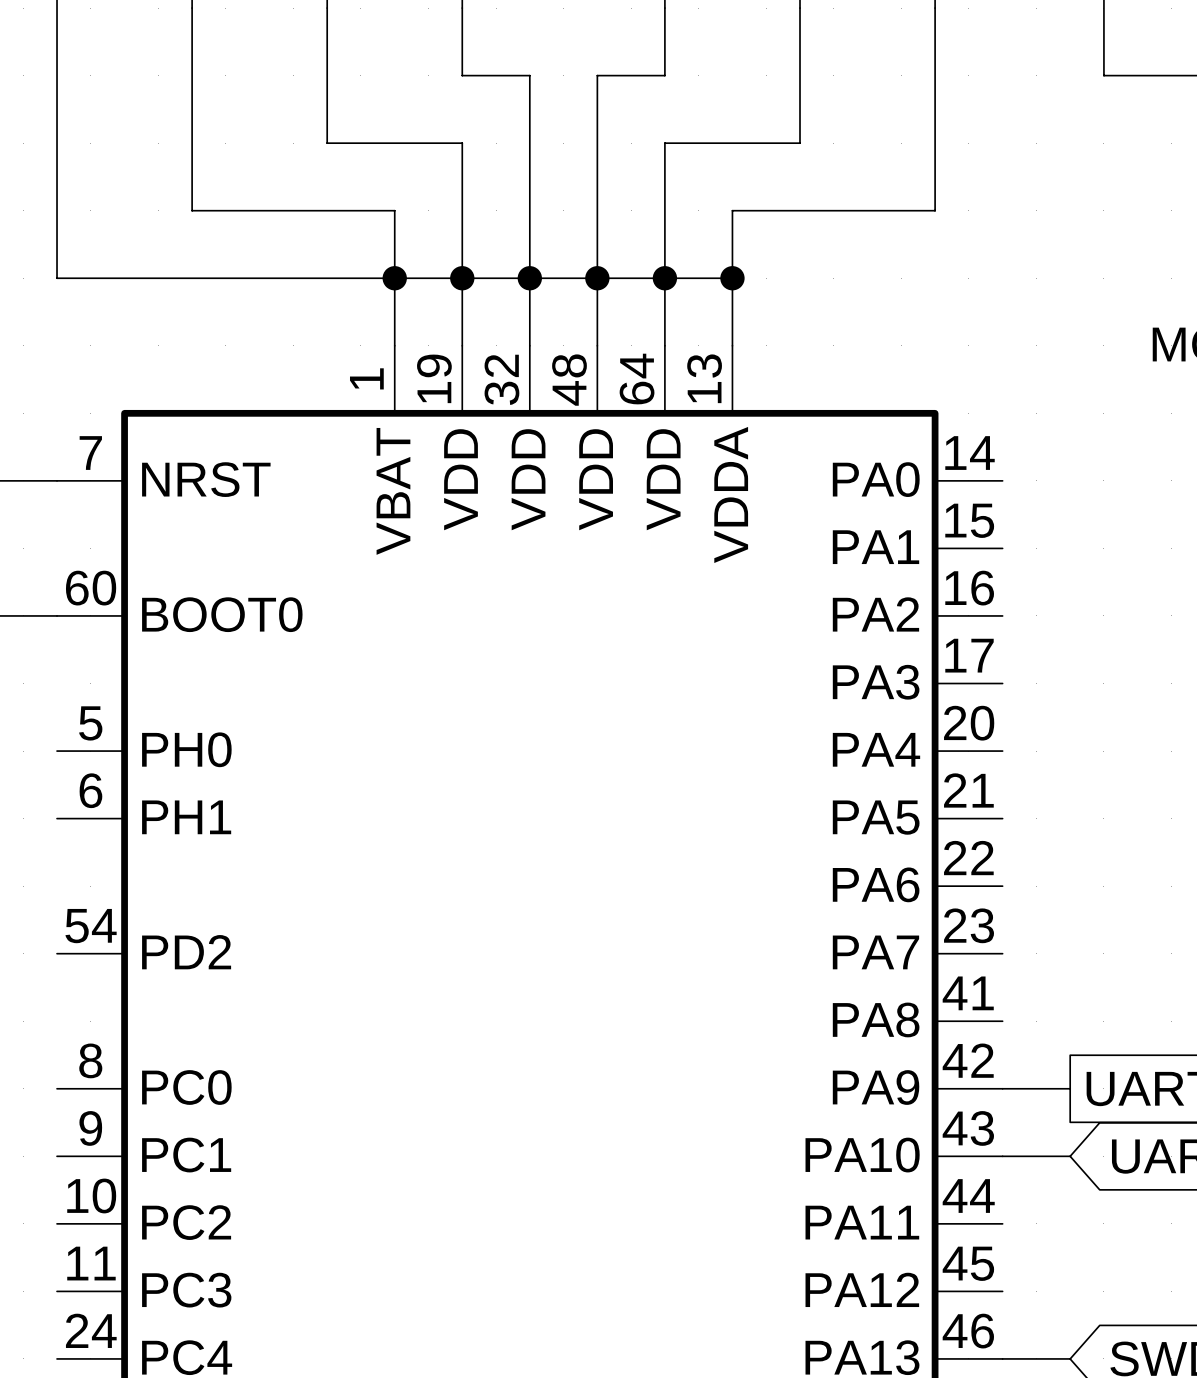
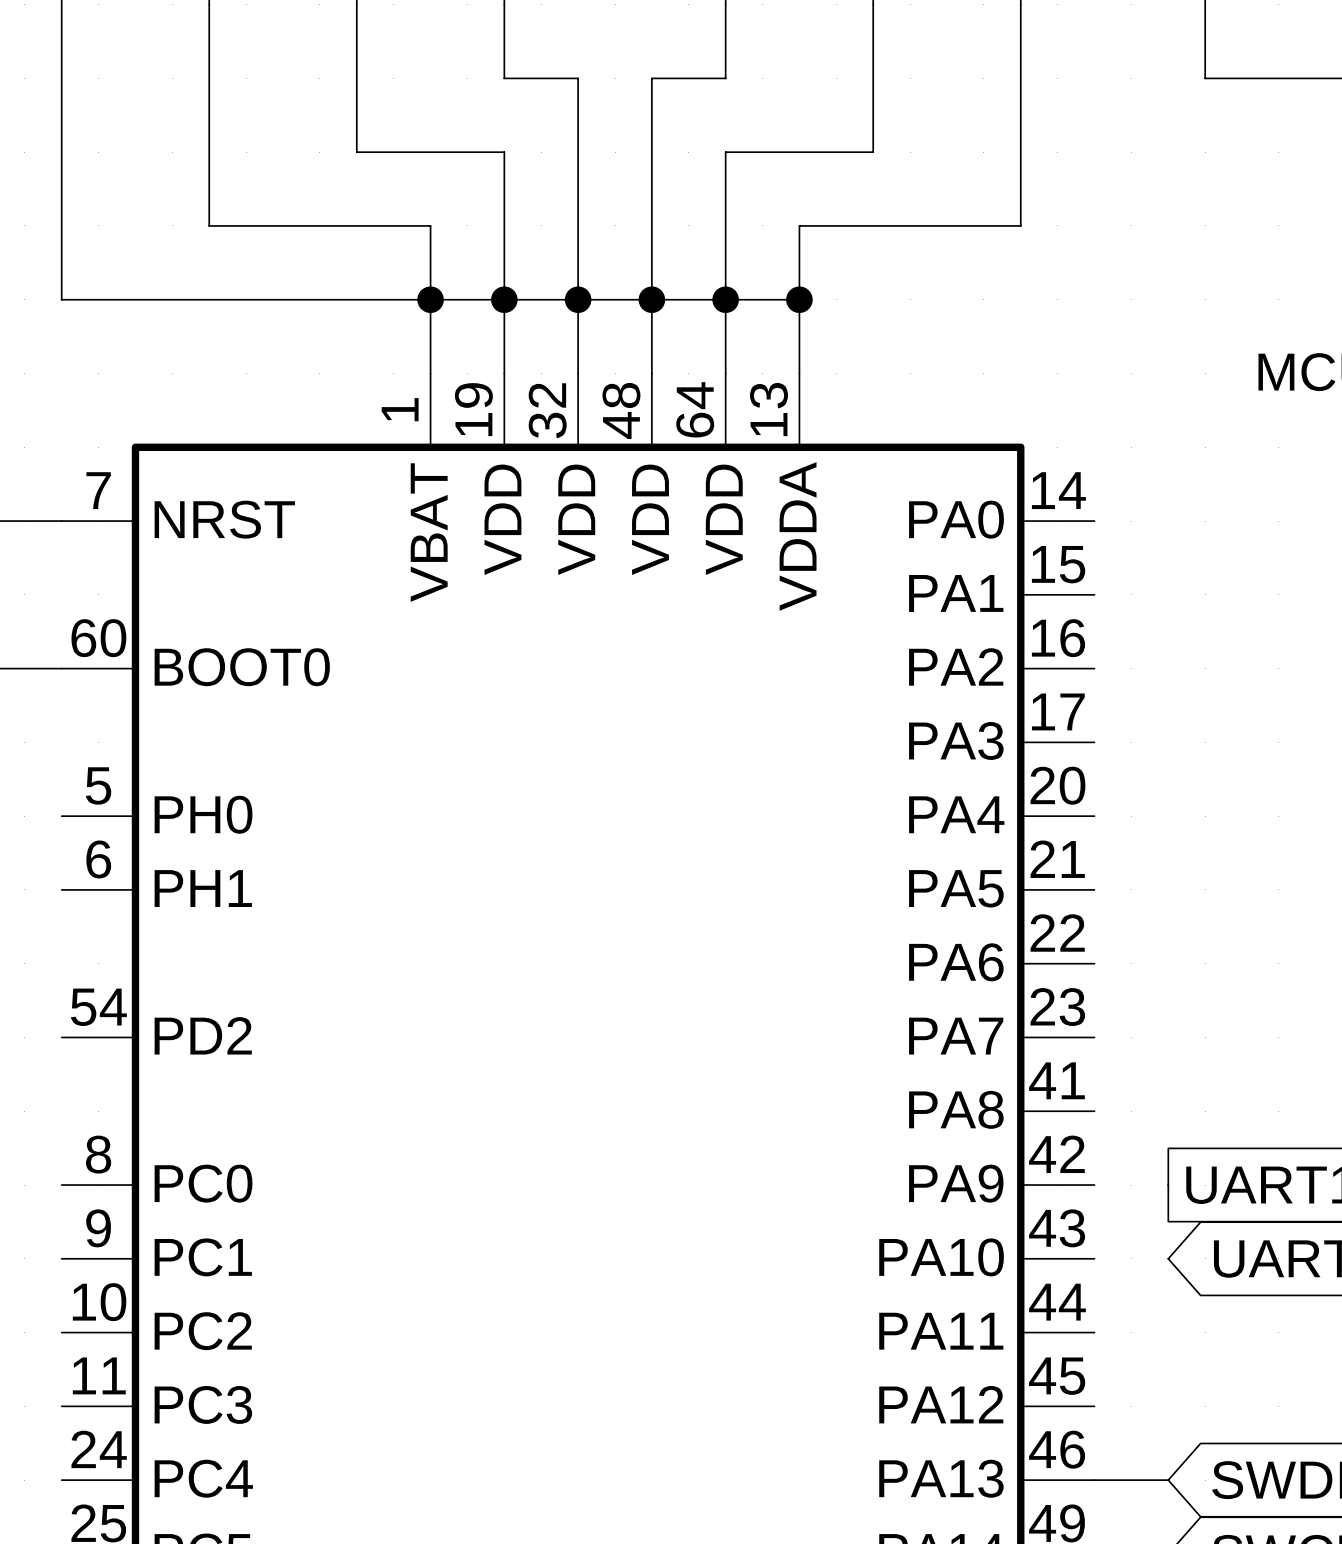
wire: (1002, 1088) (1070, 1088) -> none
wire: (1002, 1156) (1070, 1156) -> none

